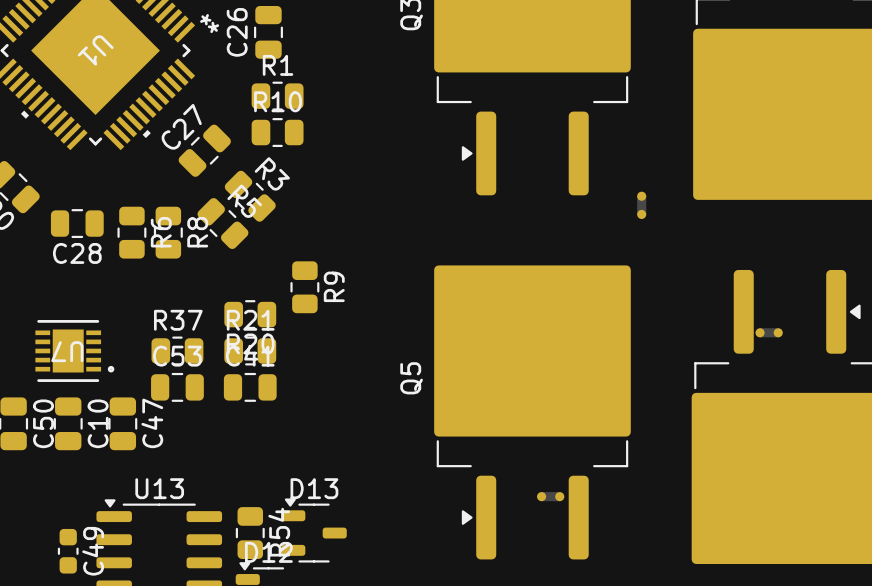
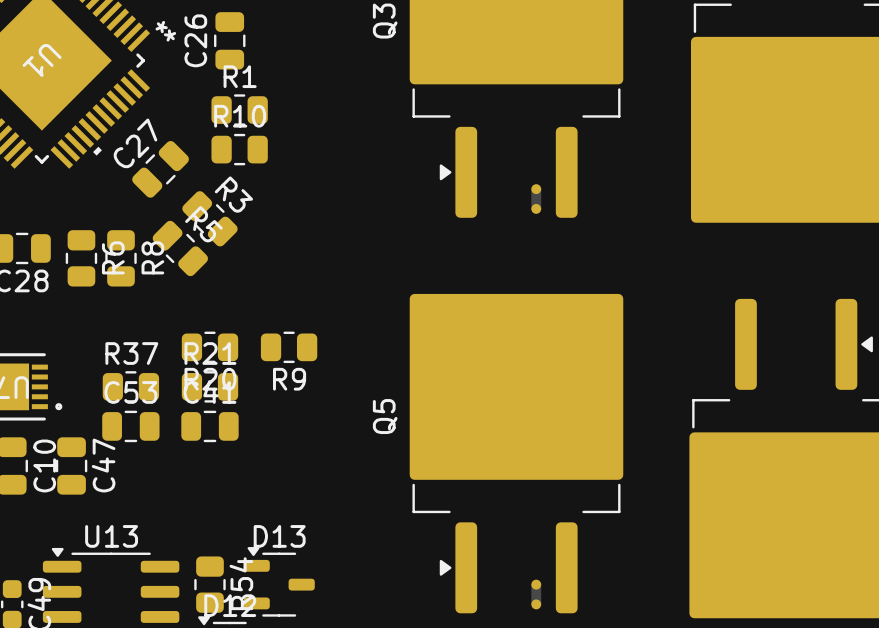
part position: (641, 205) -> (536, 199)
R9 rotation: 0° (304, 287) -> 90° clockwise (289, 347)
R9 position: (304, 287) -> (289, 347)
part: (769, 332) -> none
part rotation: 0° (550, 496) -> 90° clockwise (536, 594)
part position: (550, 496) -> (536, 594)

